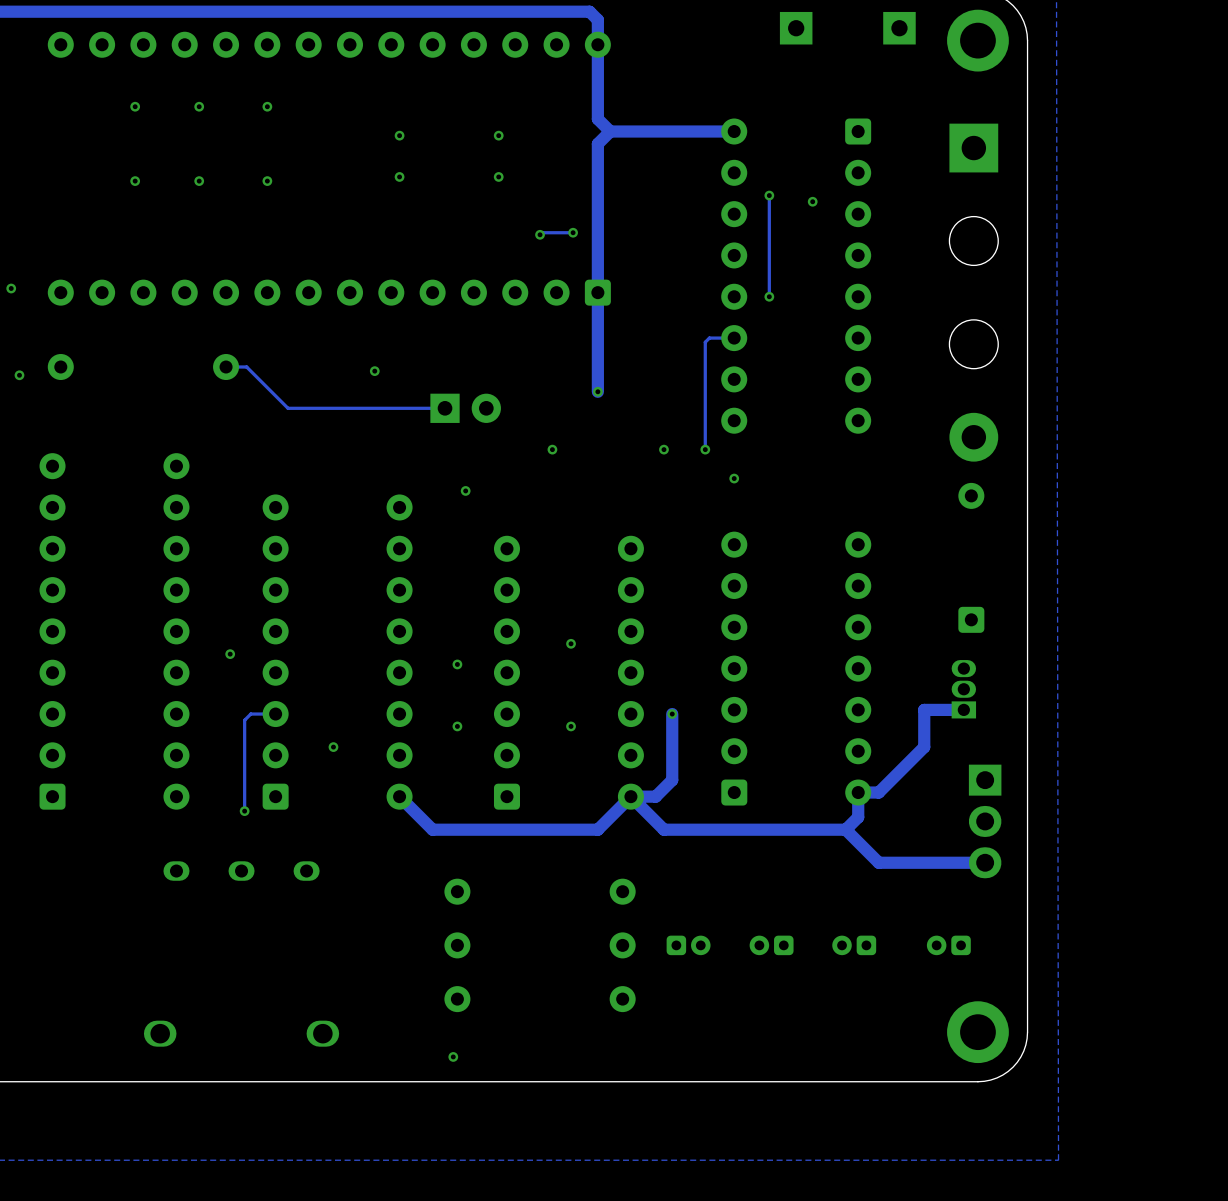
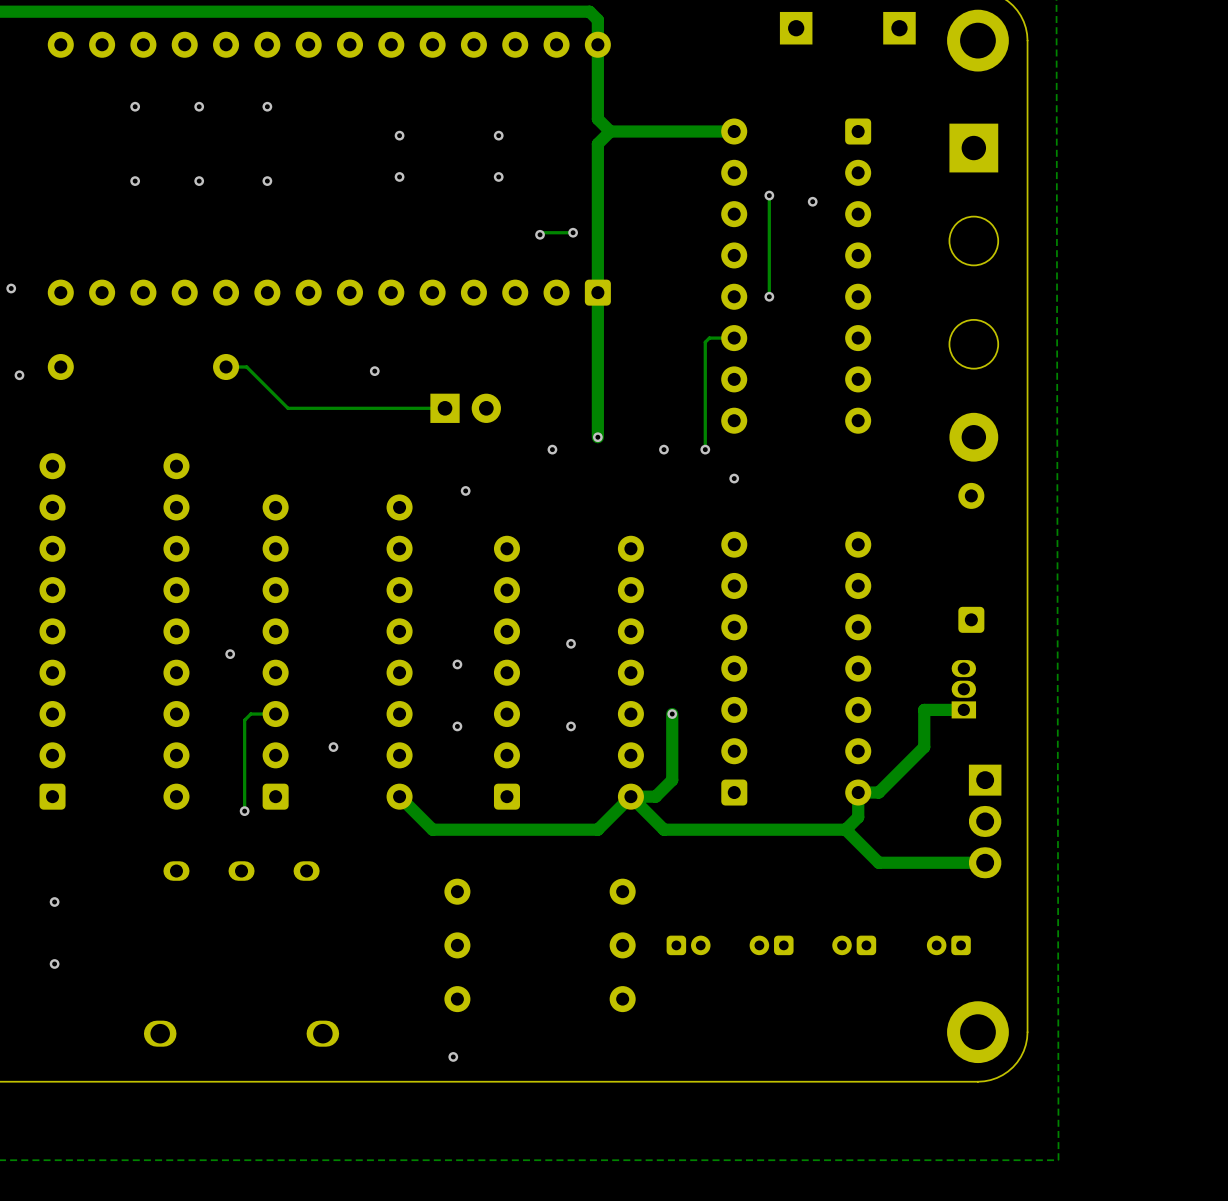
track: none -> (597, 391) (597, 437)
via position: (597, 391) -> (597, 437)
via: none -> (54, 902)
via: none -> (54, 963)

